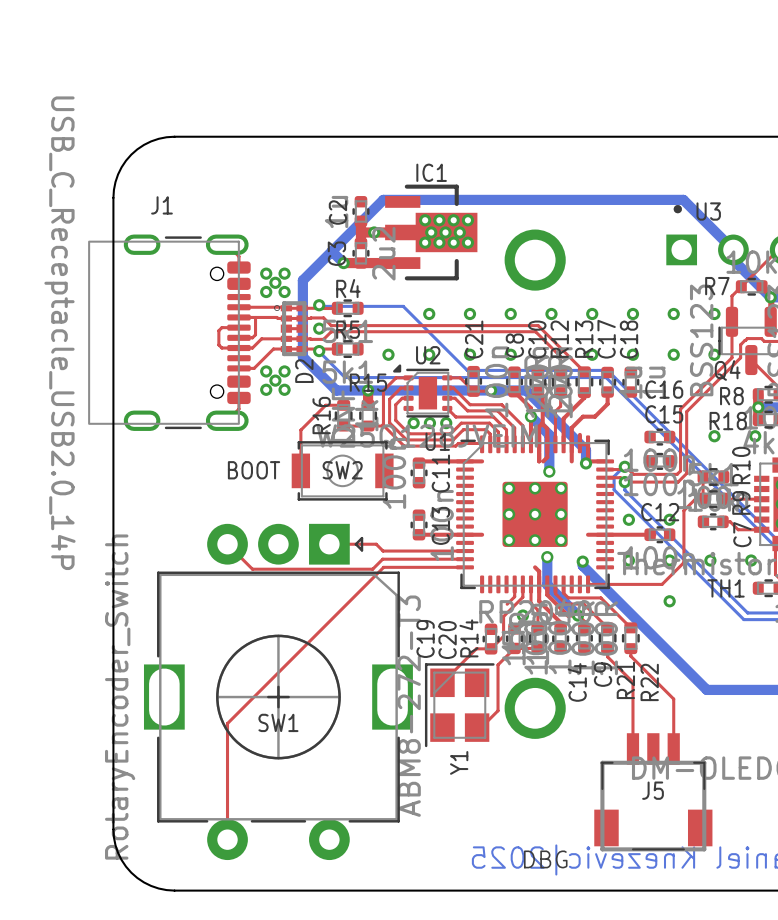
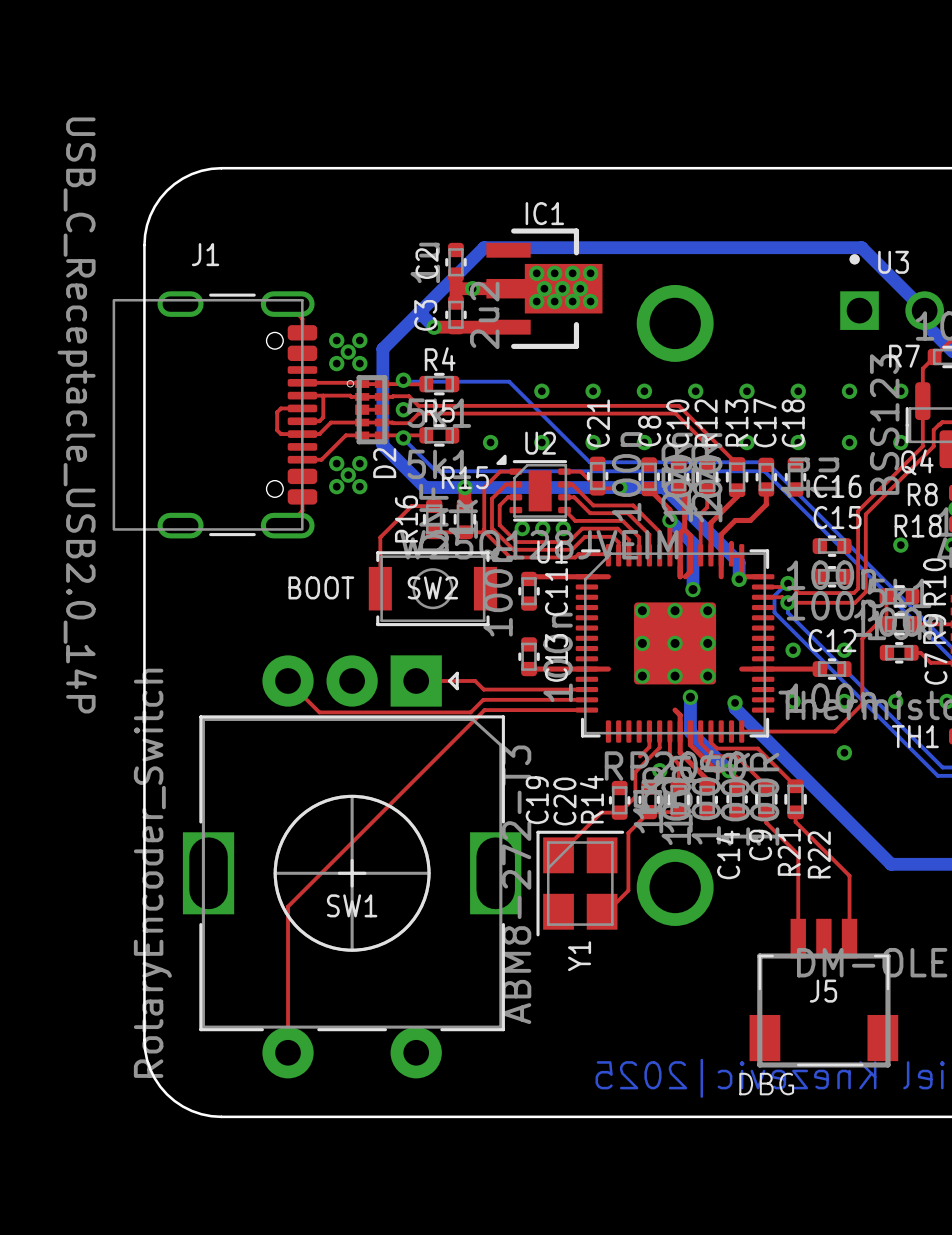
text position: DBG (545, 859) -> DBG (766, 1084)

